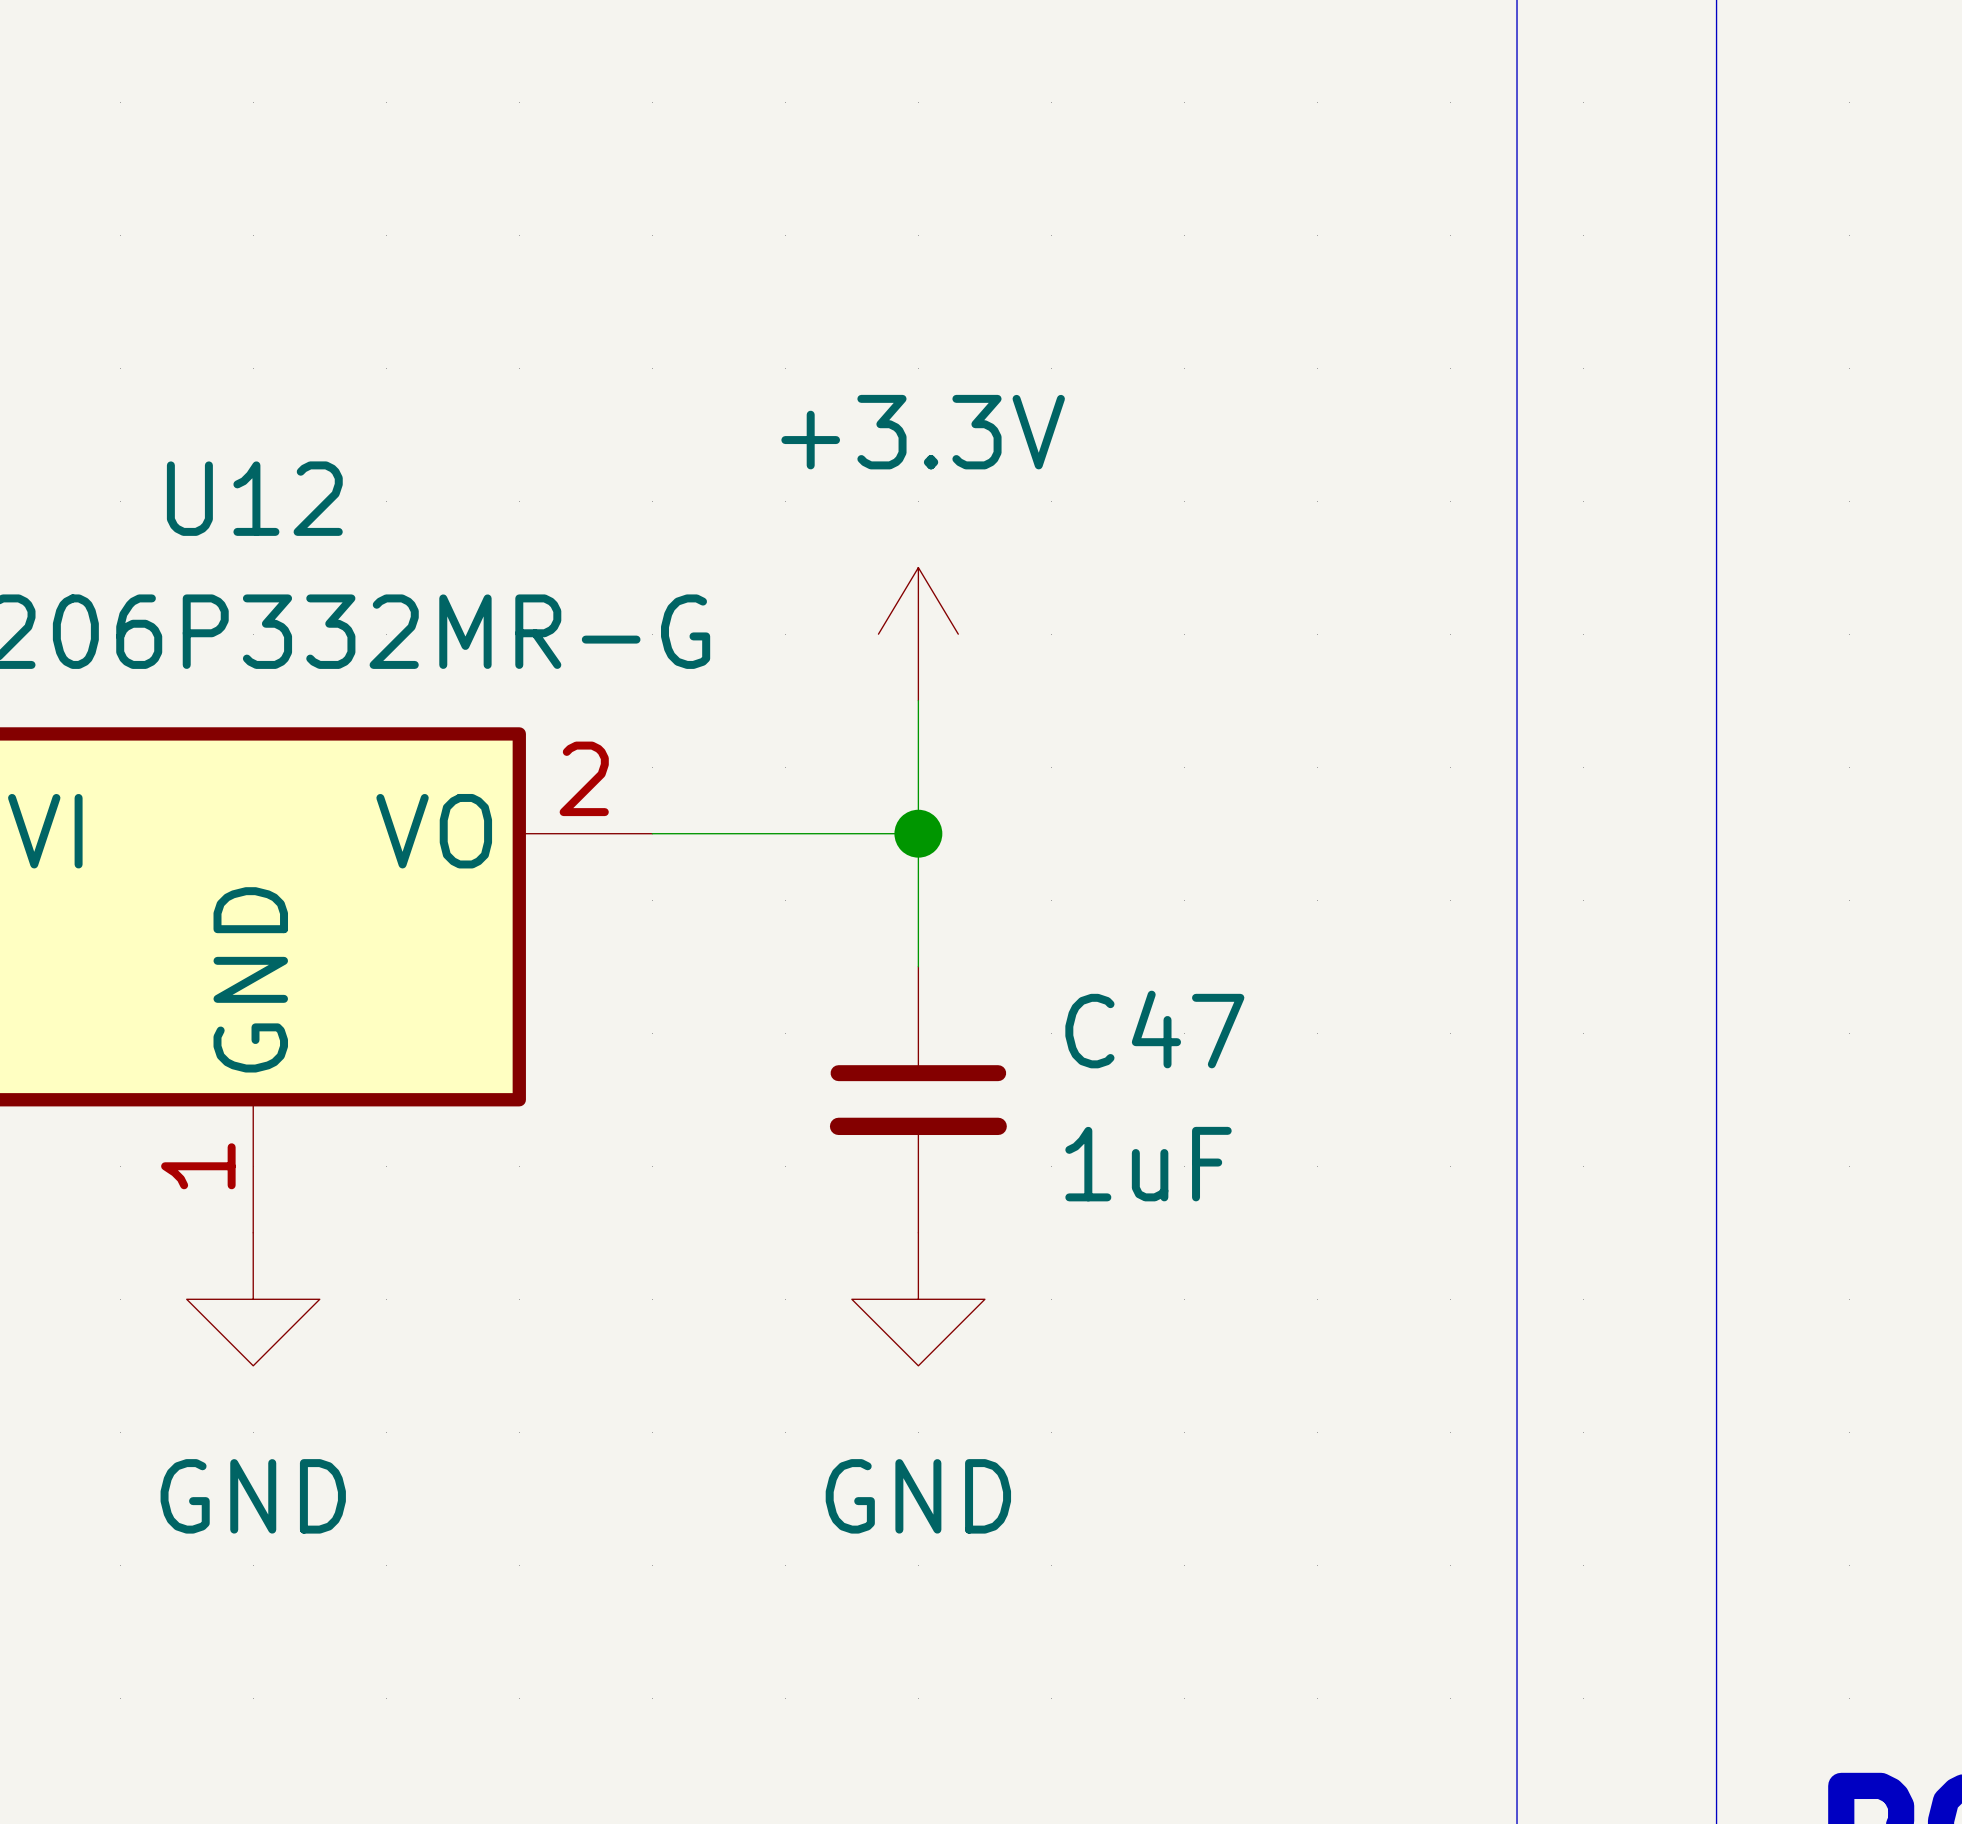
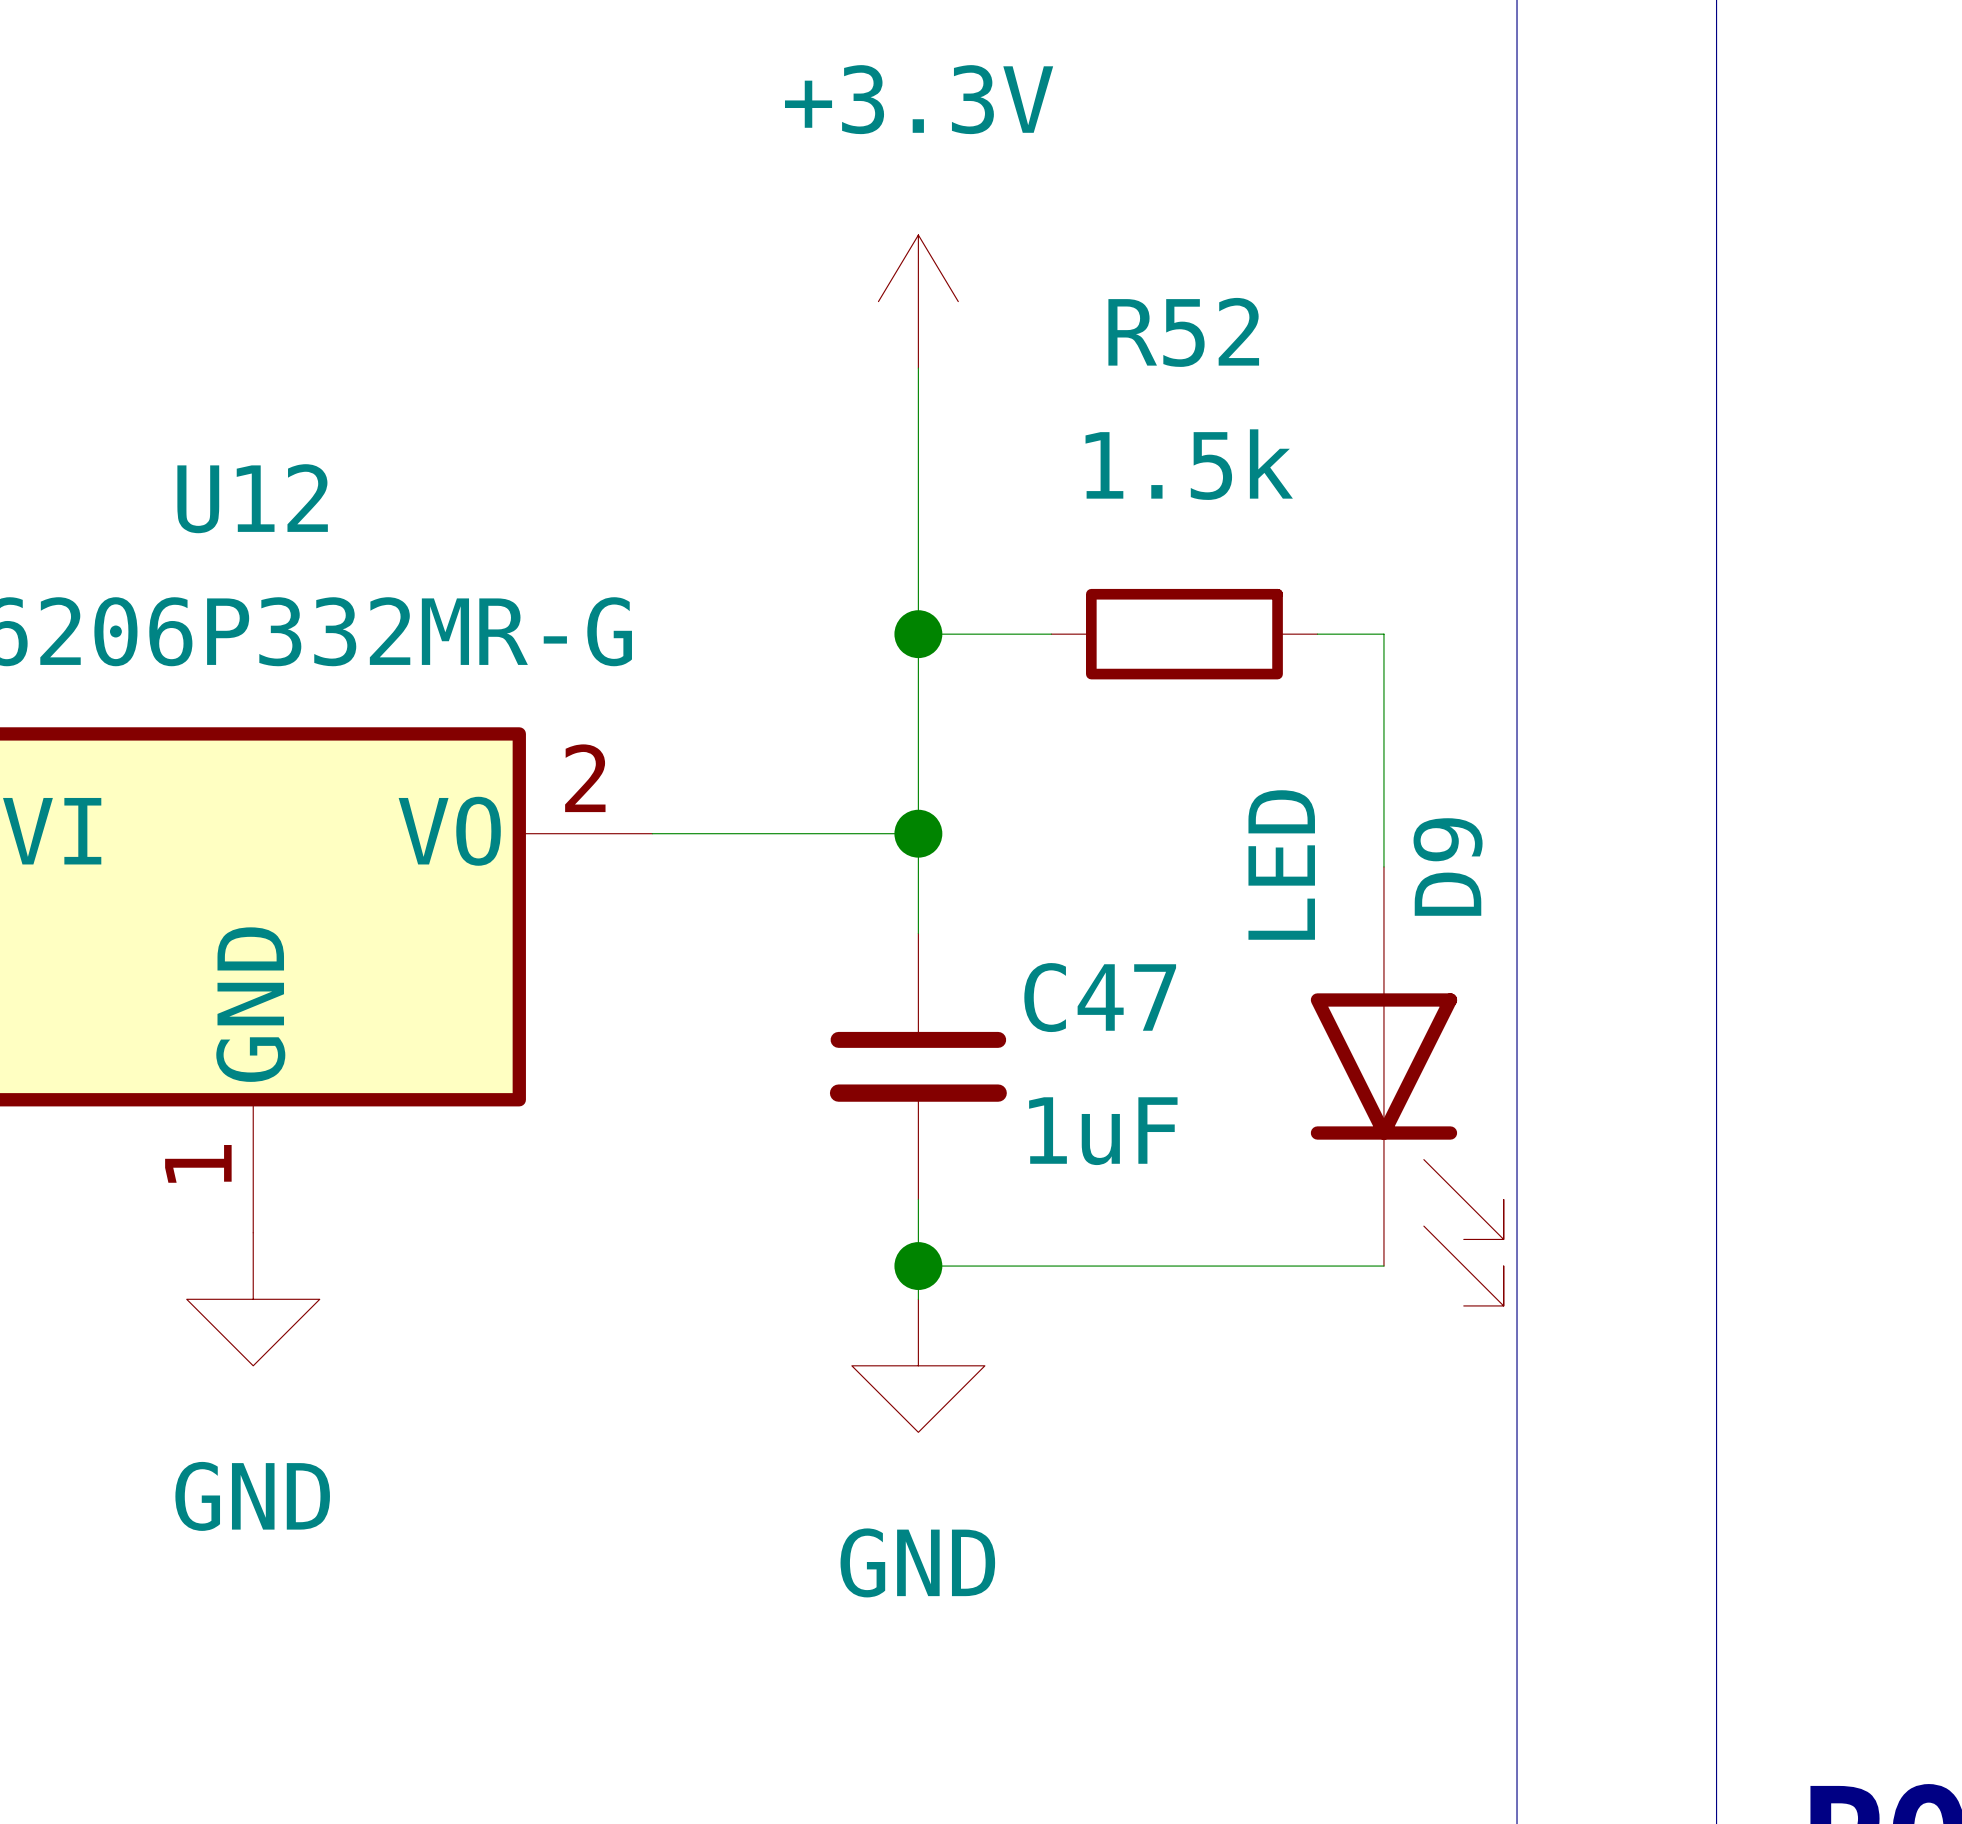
wire: none -> (918, 368) (918, 700)
wire: none -> (918, 634) (1051, 634)
power symbol position: +3.3V (918, 634) -> +3.3V (918, 301)
junction: none -> (918, 634)
R52: none -> 1.5k (1184, 634)
wire: none -> (1317, 634) (1383, 634) (1383, 866)
C47 name position: C47 (1154, 1029) -> C47 (1100, 997)
D9: none -> LED (1407, 1086)
C47 position: (918, 1099) -> (918, 1066)
C47 value position: 1uF (1148, 1164) -> 1uF (1103, 1131)
wire: none -> (918, 1266) (1383, 1266)
junction: none -> (918, 1266)
power symbol position: GND (918, 1299) -> GND (918, 1365)

